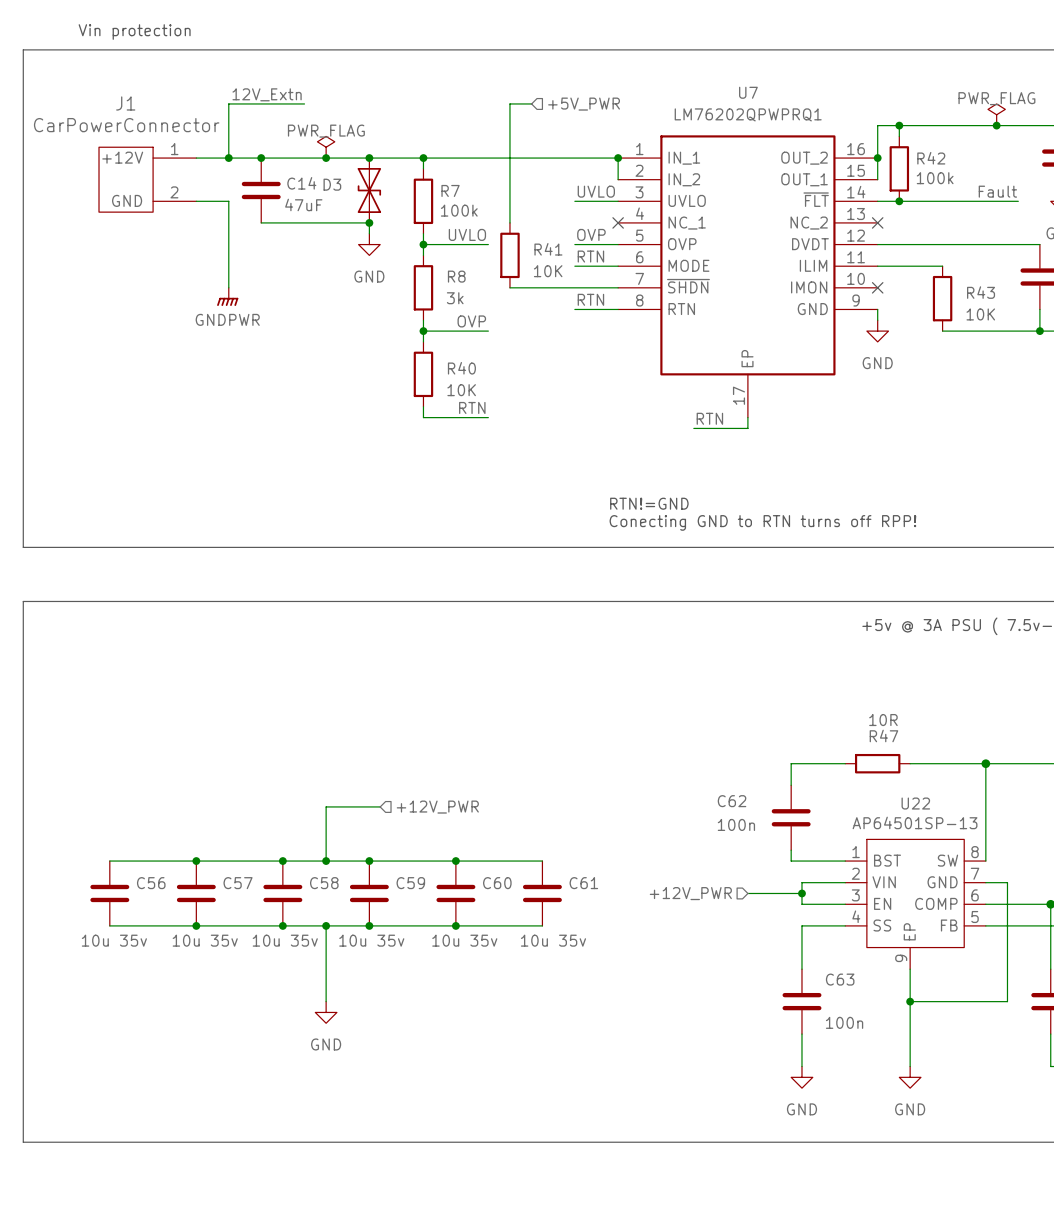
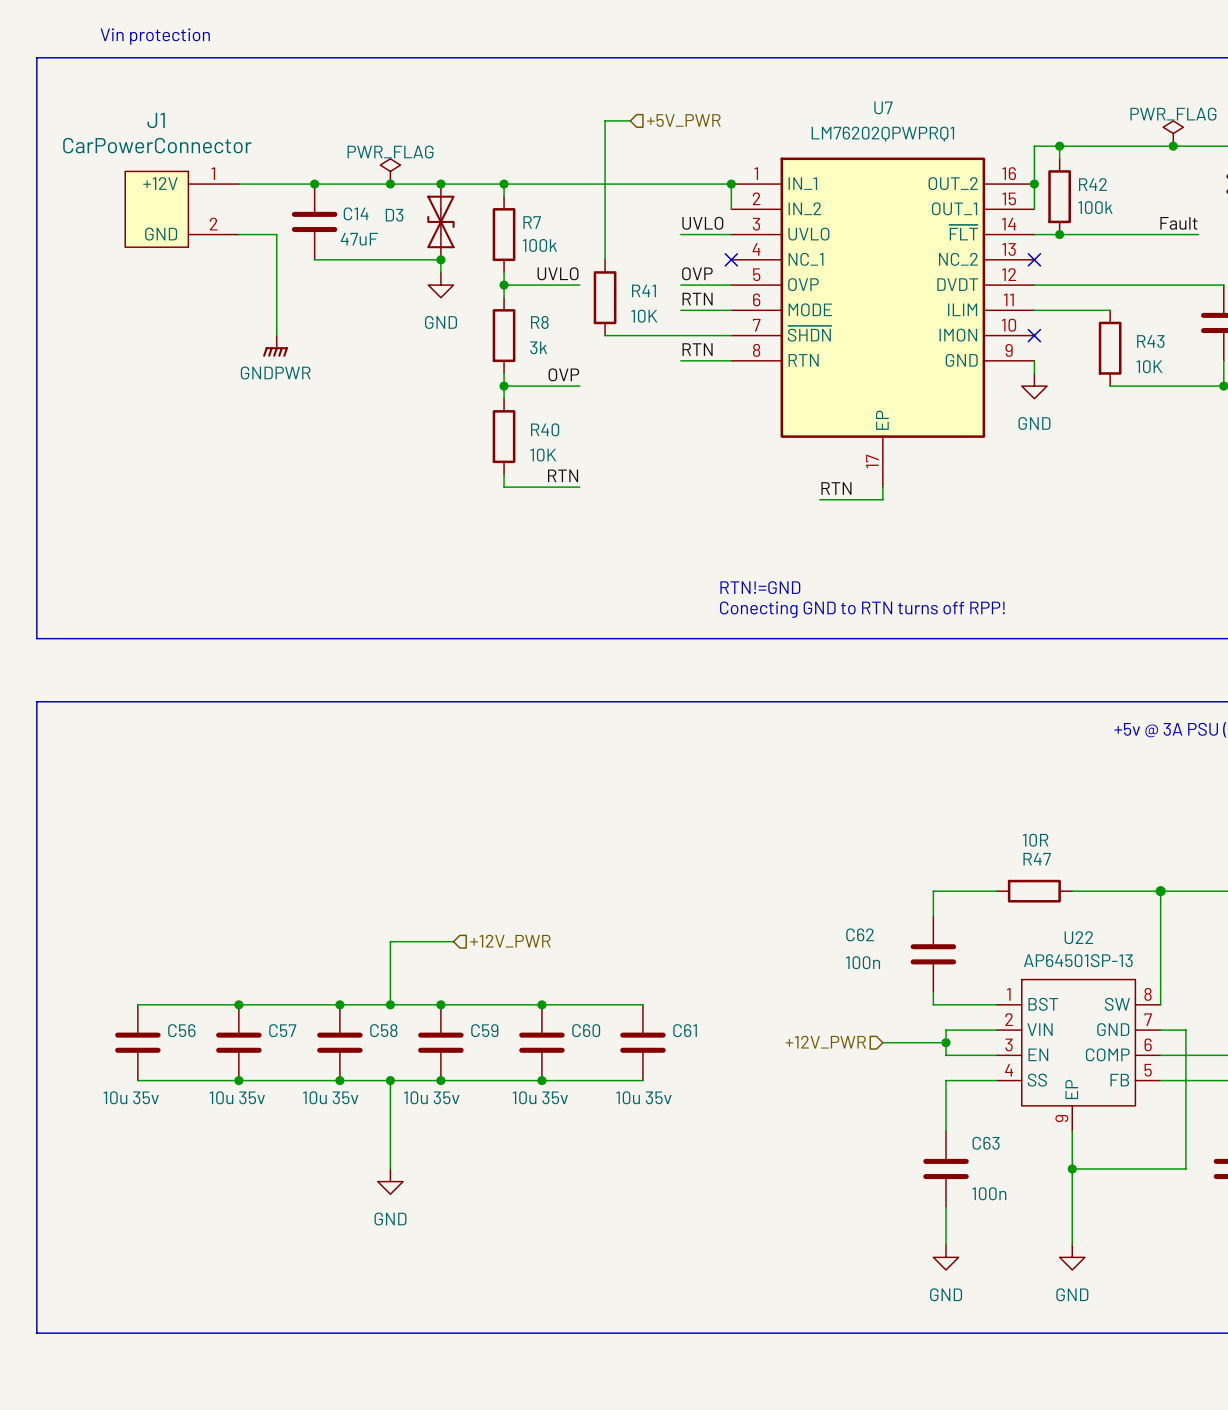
label: 12V_Extn (267, 94) -> none
wire: (304, 103) (228, 103) (228, 158) -> none
junction: (228, 158) -> none

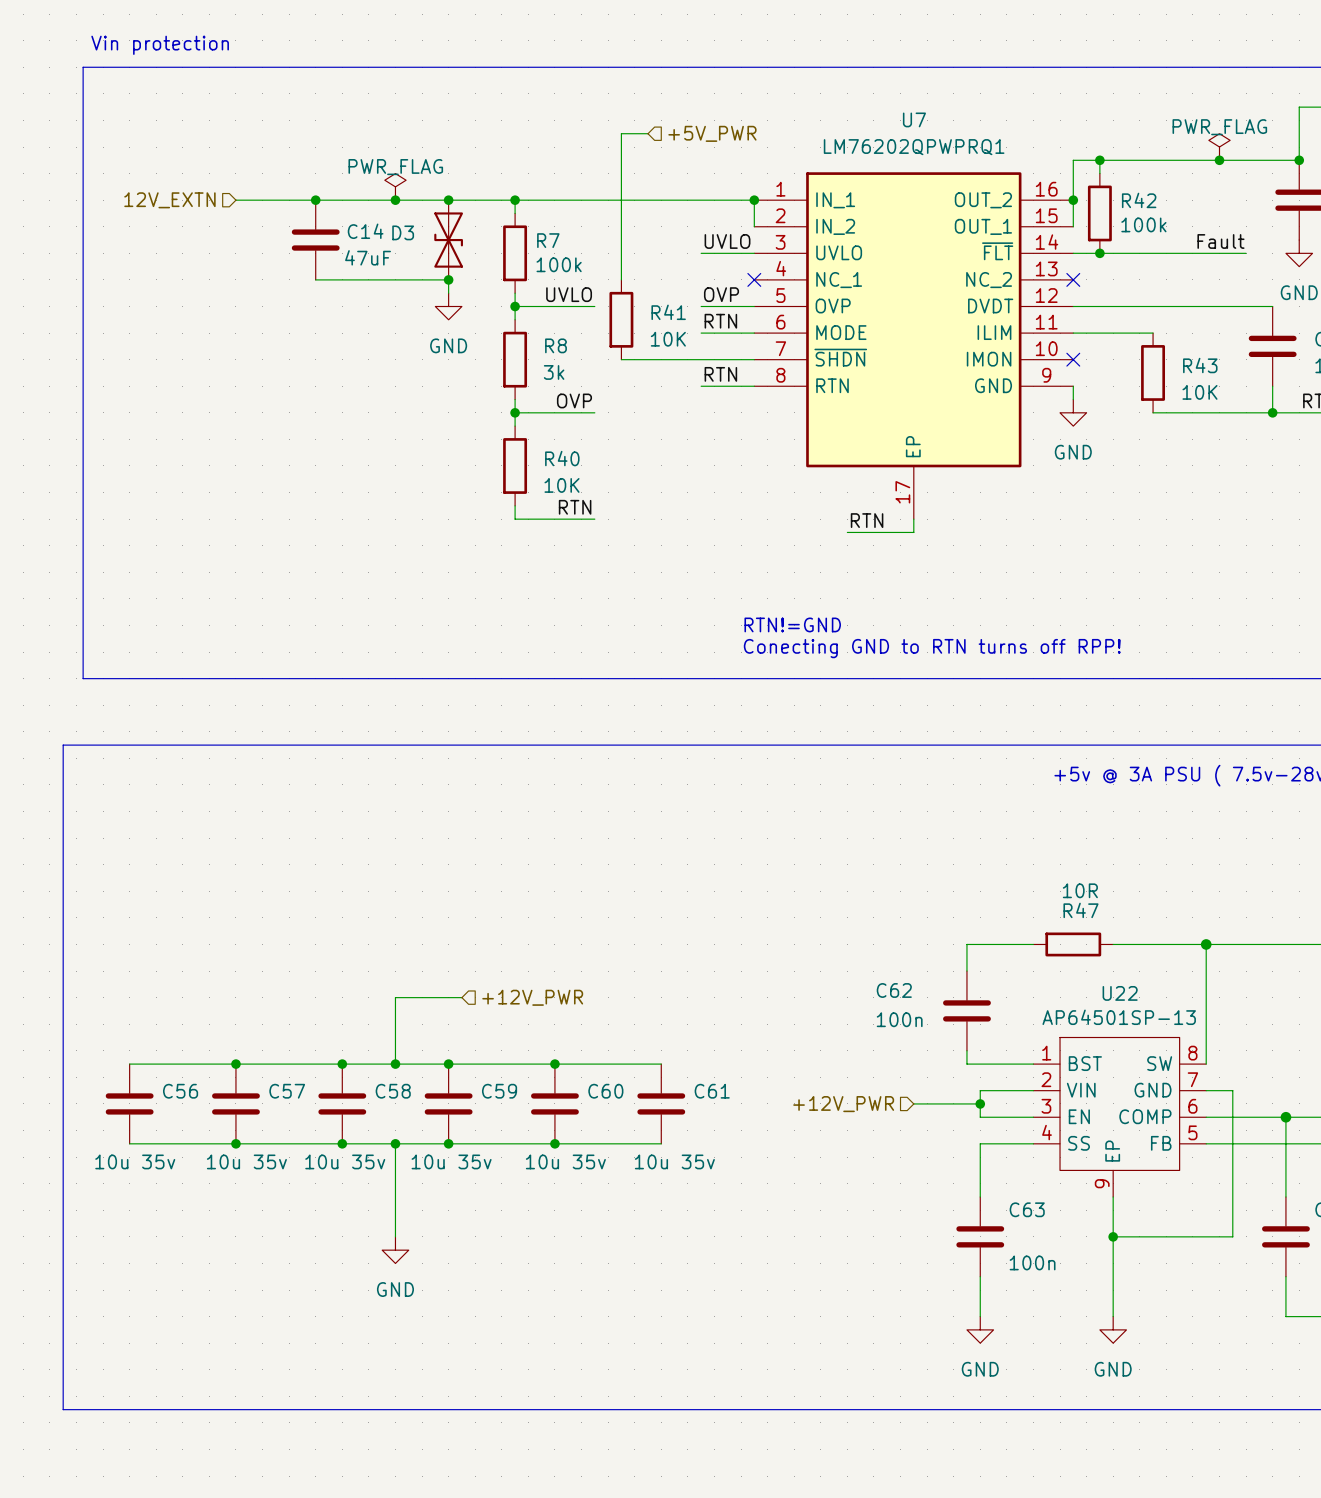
line: (93, 57) (36, 57) (36, 638) (93, 638) -> (83, 67) (83, 678)
hierarchical label: none -> 12V_EXTN (169, 200)
J1: CarPowerConnector (182, 209) -> none
wire: (238, 234) (276, 234) (276, 335) -> none
power symbol: GNDPWR (275, 346) -> none
line: (74, 701) (36, 701) (36, 1333) (74, 1333) -> (63, 745) (63, 1409)

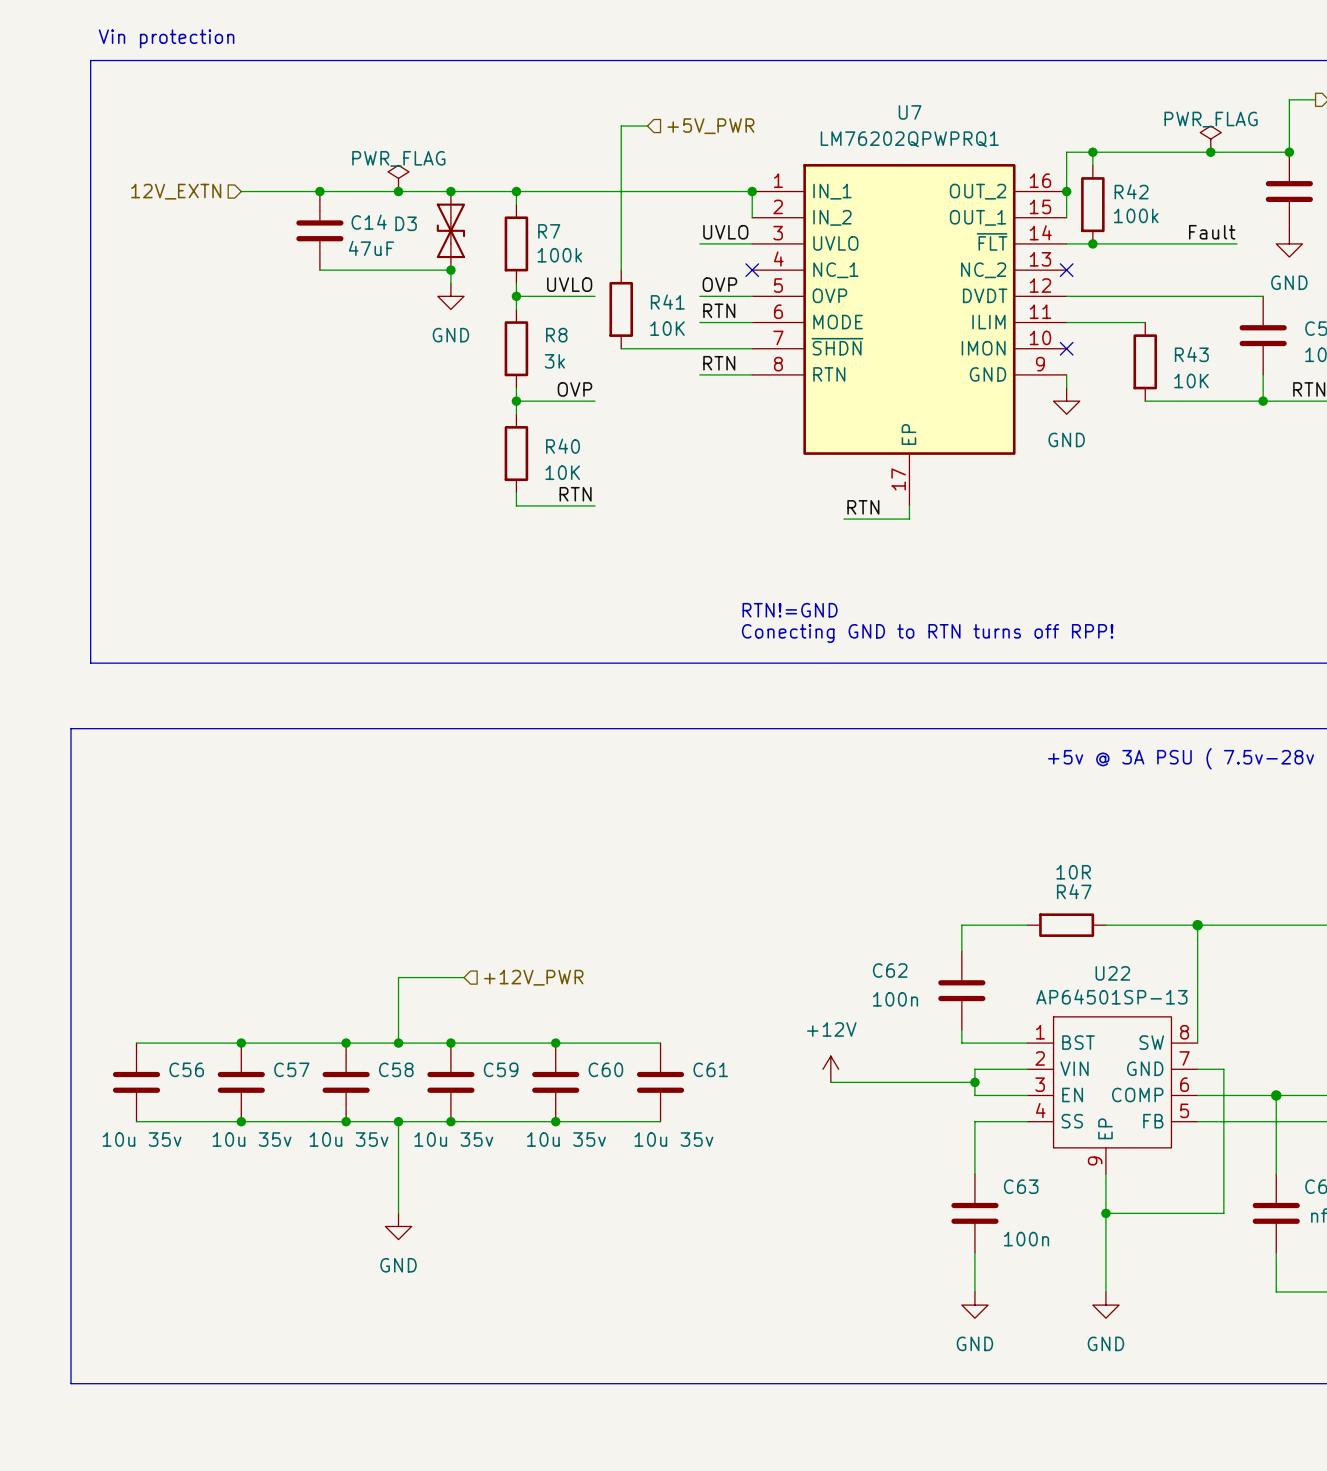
power symbol: none -> +12V (830, 1069)
wire: none -> (830, 1082) (909, 1082)
hierarchical label: +12V_PWR (843, 1104) -> none

